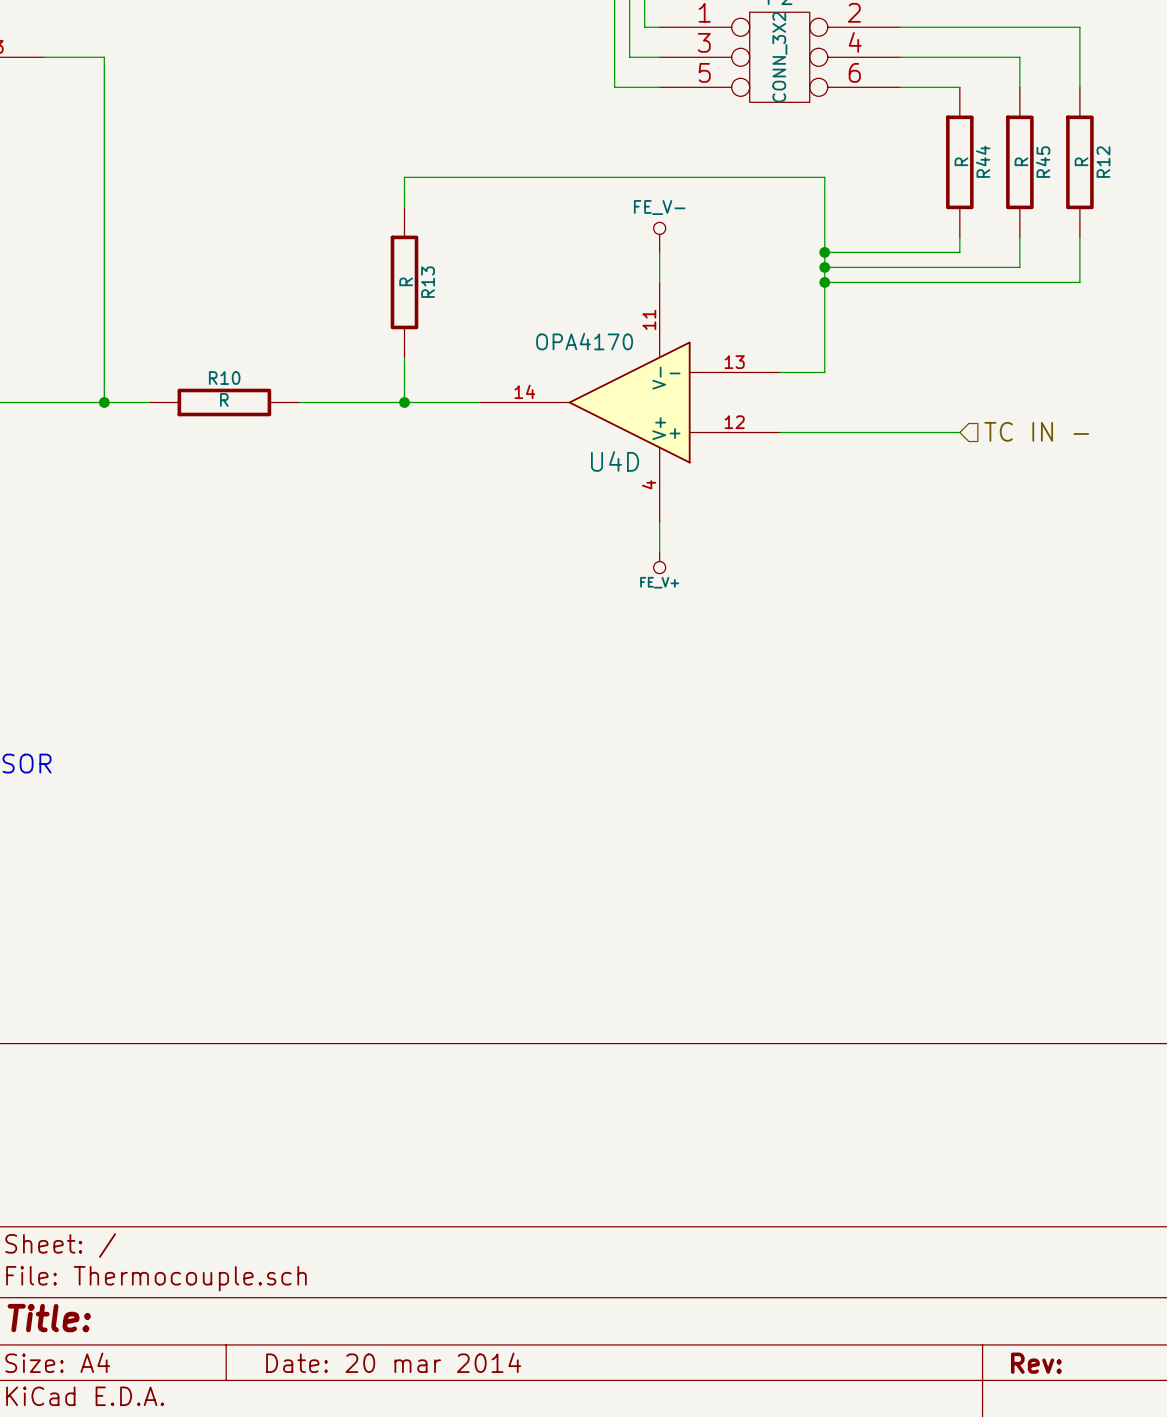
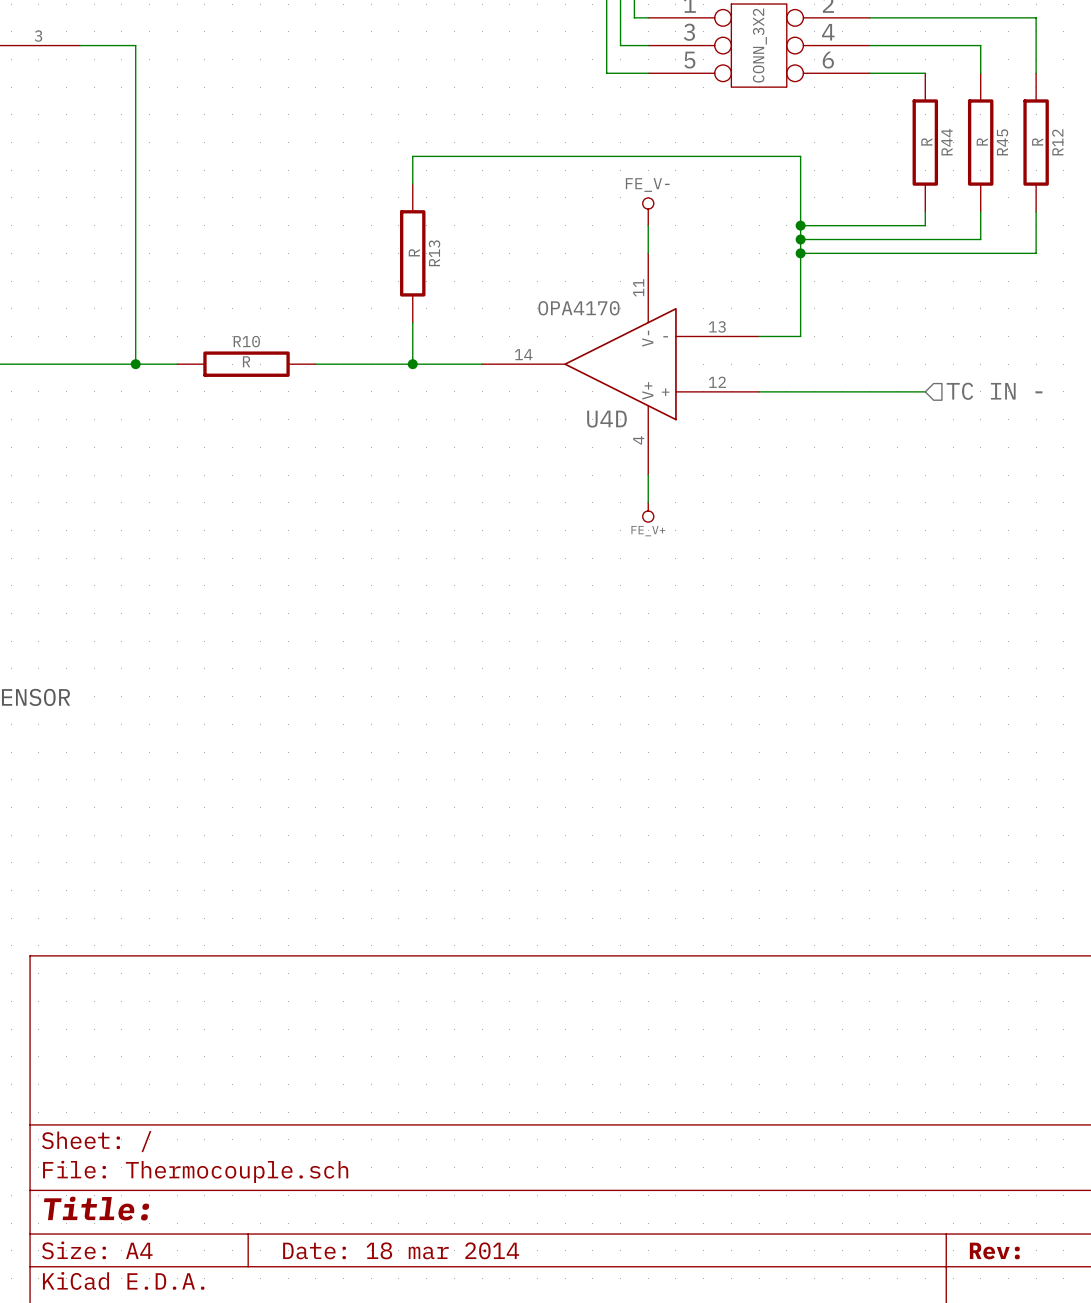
title block: Date: 20 mar 2014 (393, 1362) -> Date: 18 mar 2014 (401, 1250)

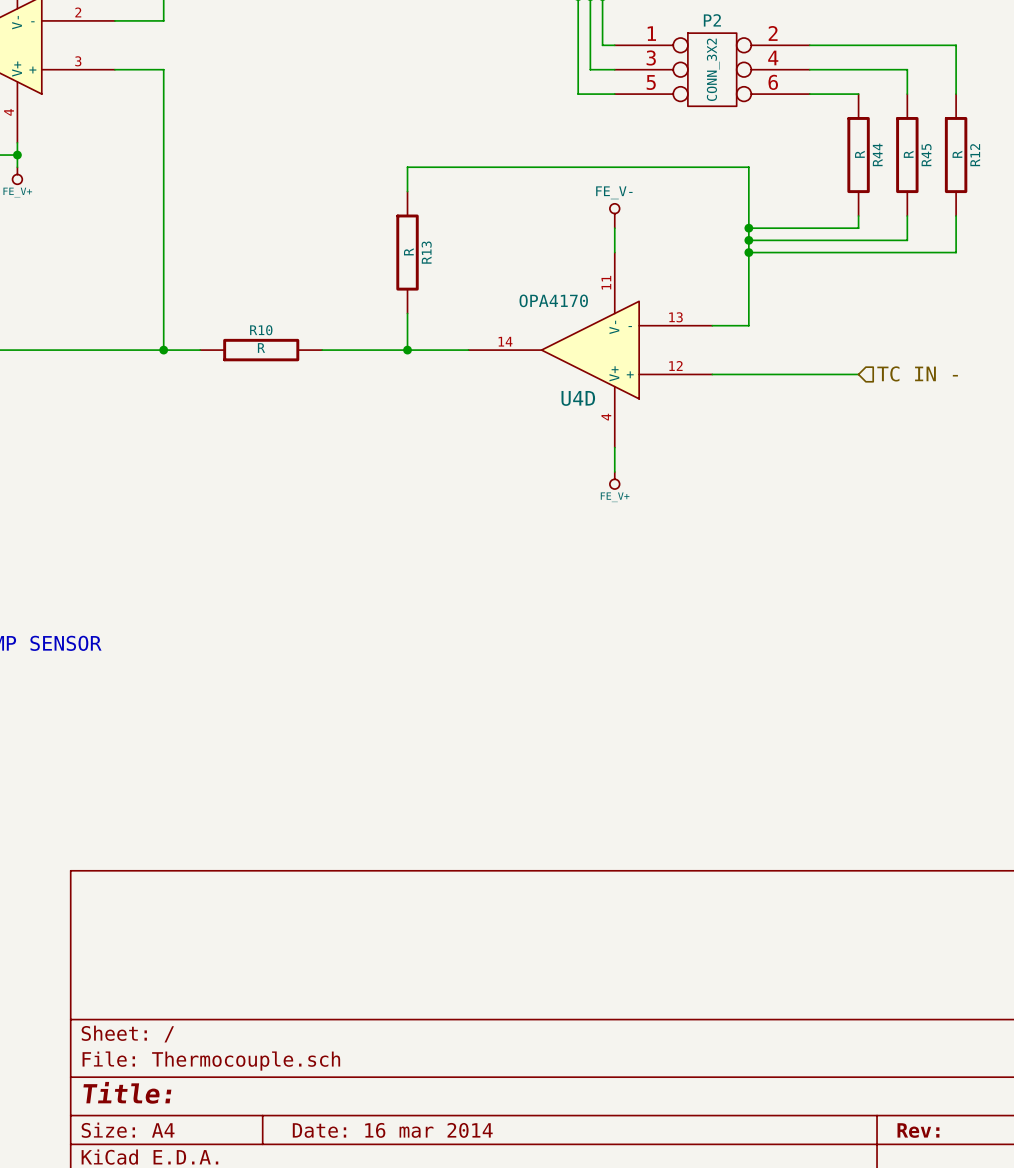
title block: Date: 18 mar 2014 (401, 1250) -> Date: 16 mar 2014 (392, 1130)

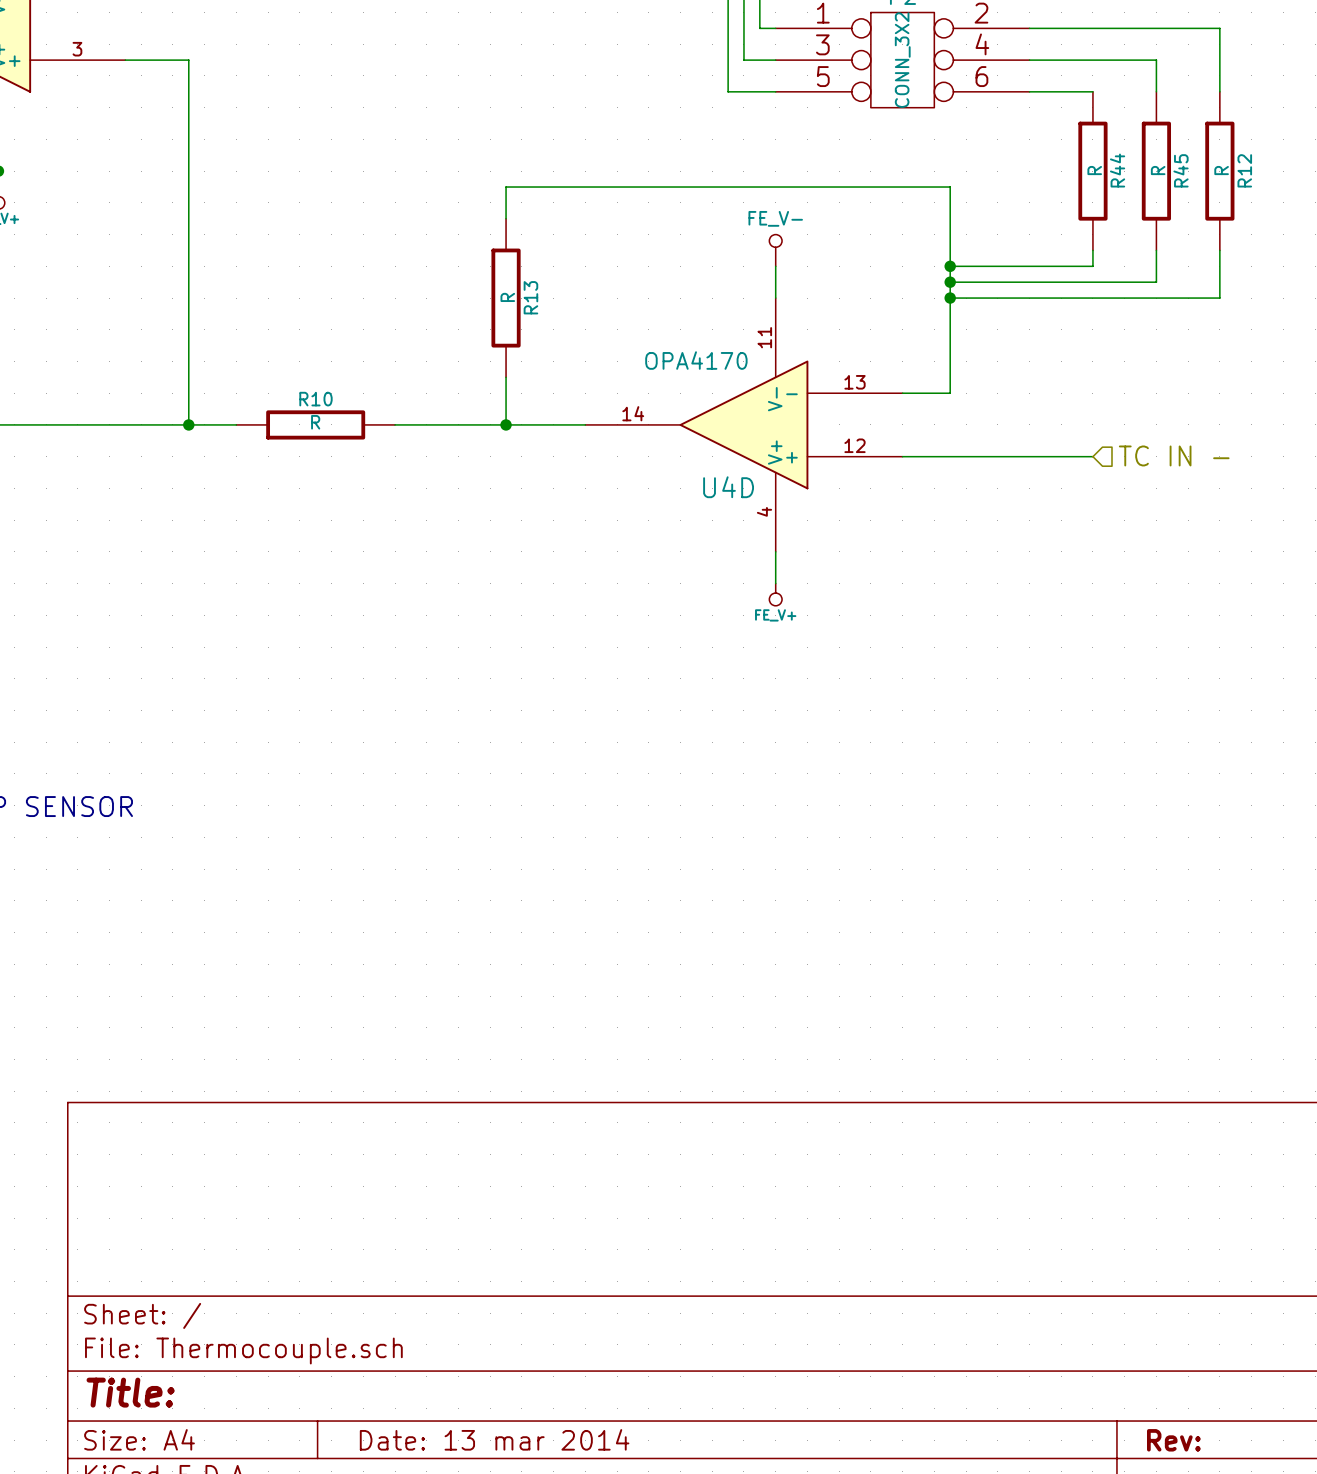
title block: Date: 16 mar 2014 (392, 1130) -> Date: 13 mar 2014 (494, 1439)

